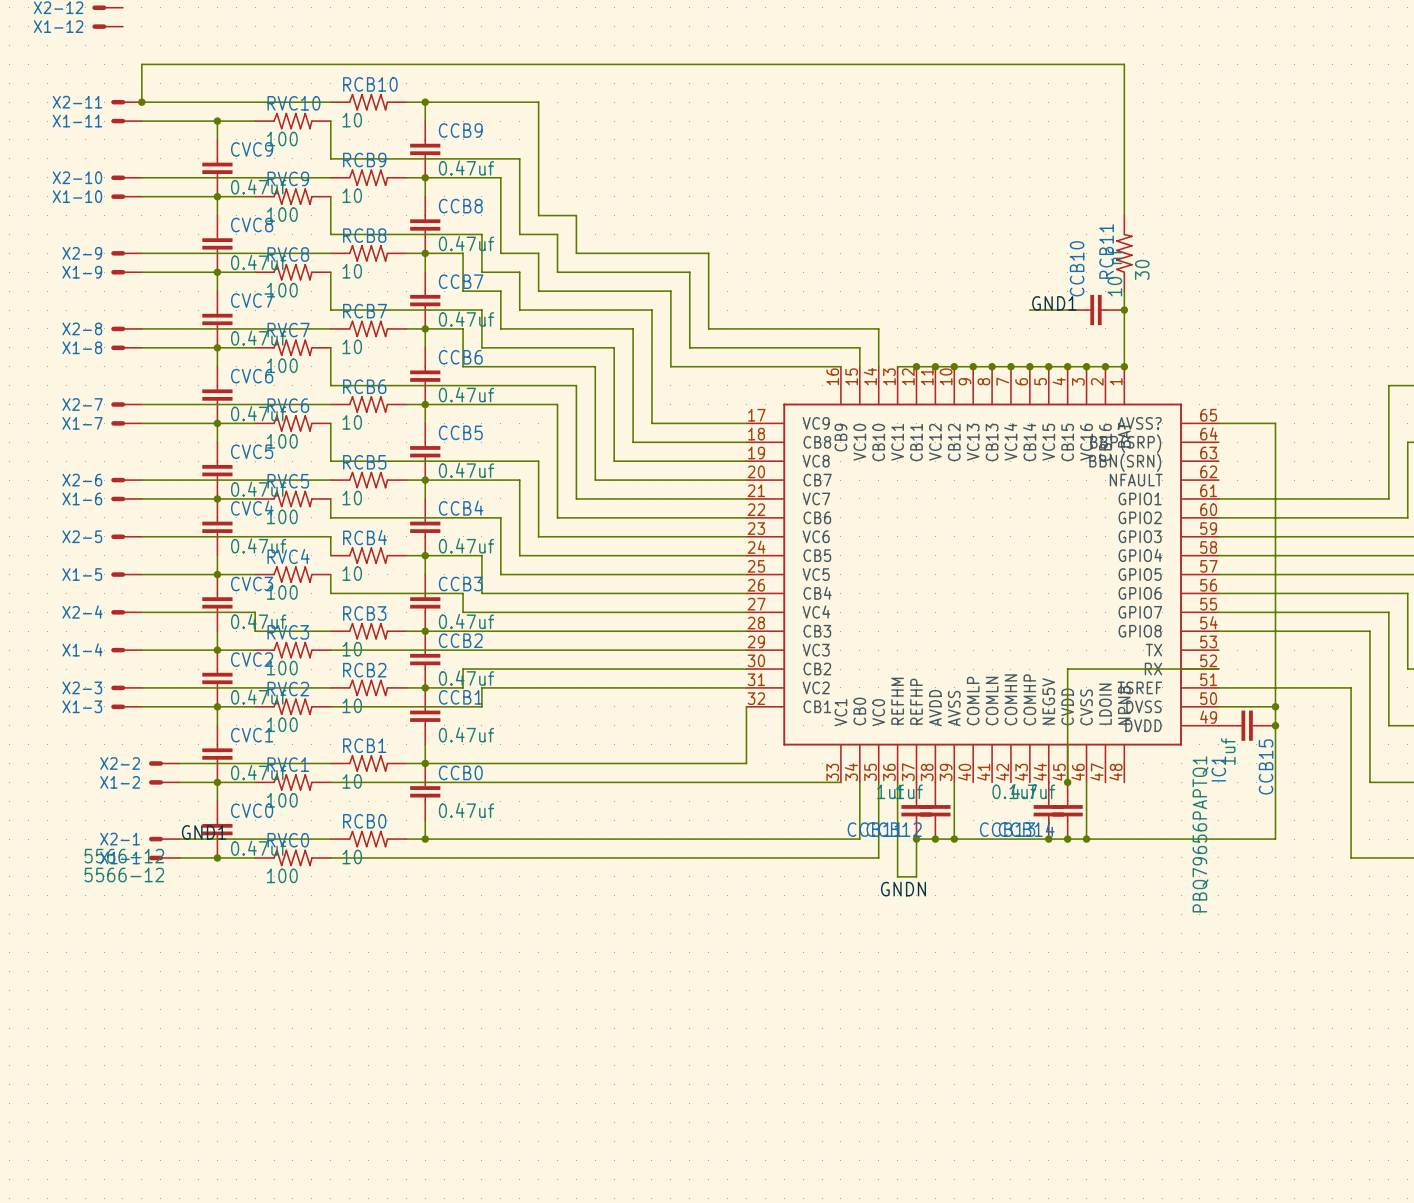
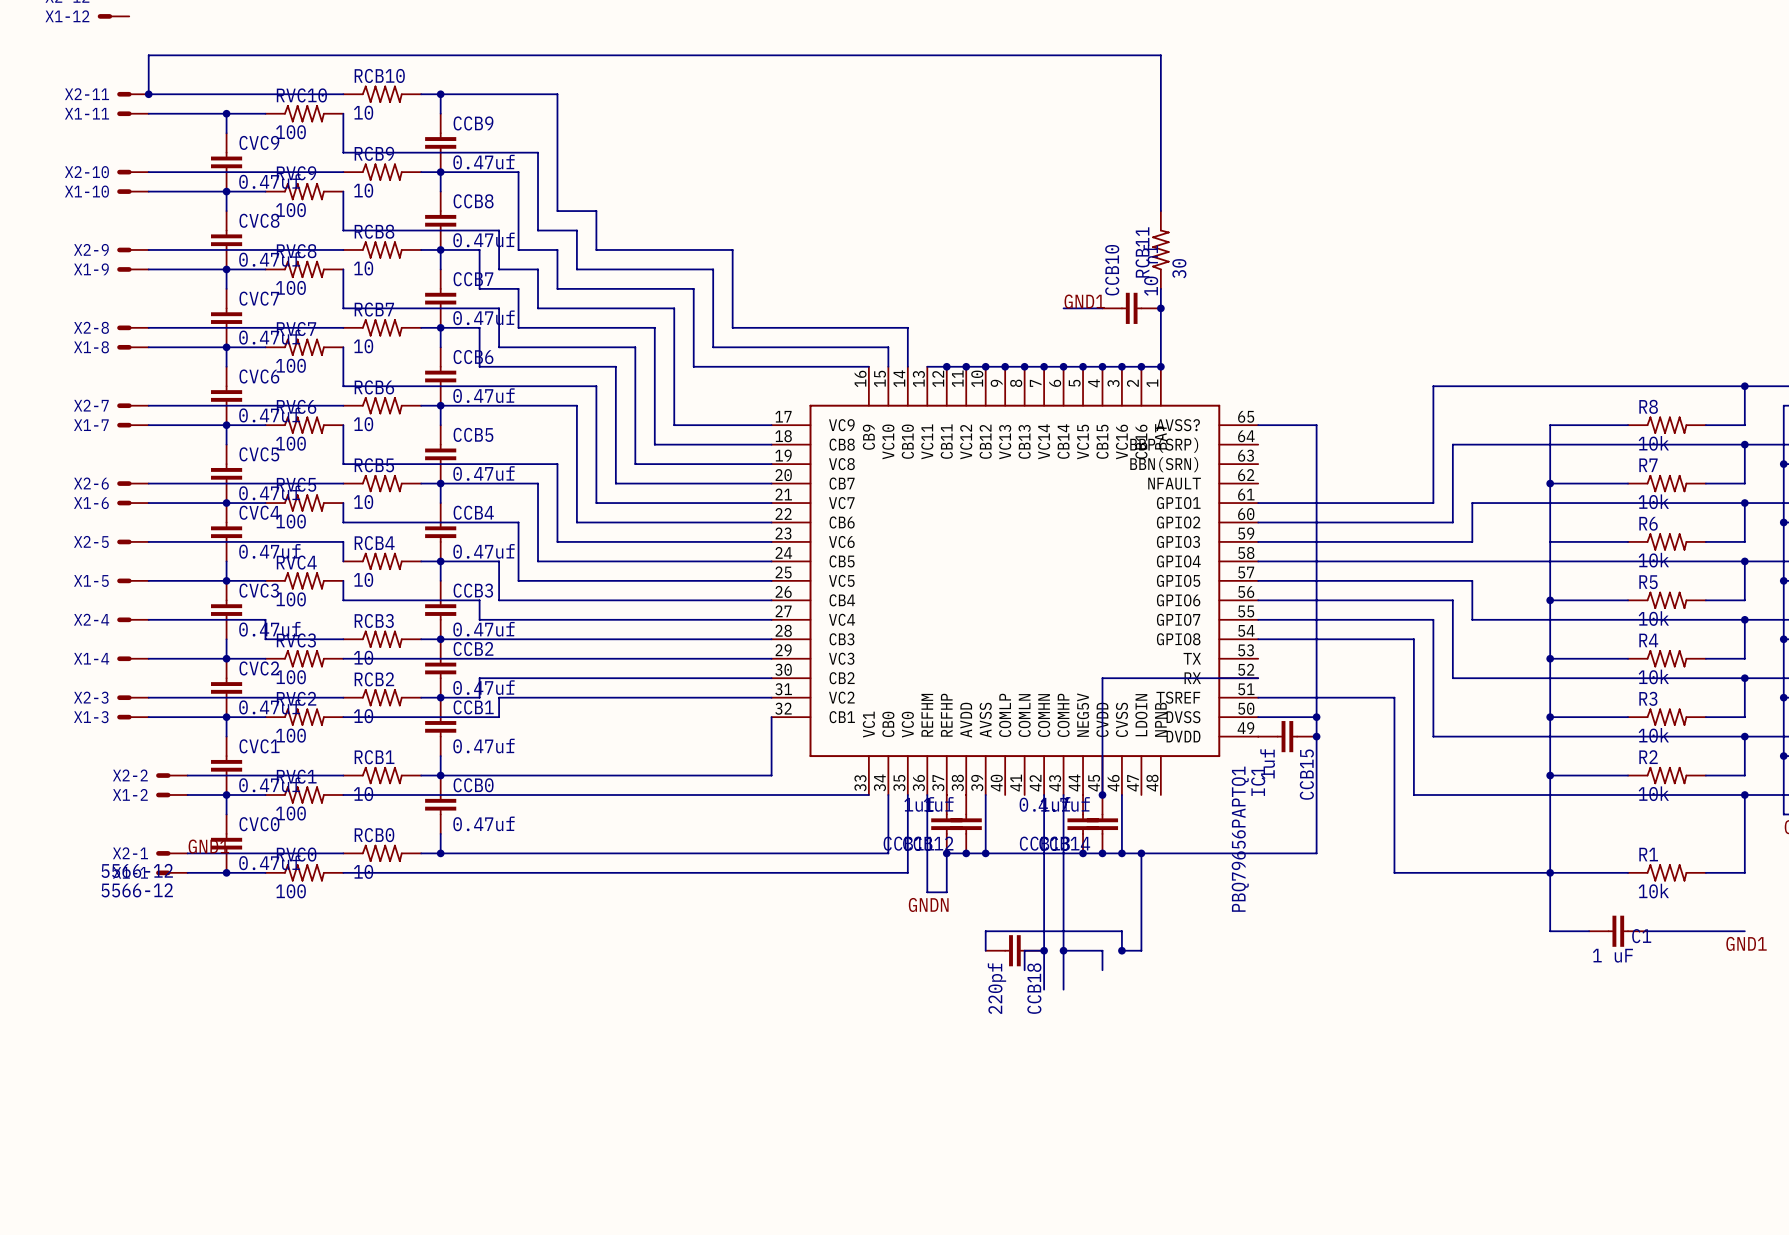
wire: none -> (1044, 795) (1044, 989)
wire: none -> (1063, 795) (1063, 989)
wire: none -> (1141, 853) (1141, 950) (1121, 950) (1121, 931) (985, 931) (985, 950)
junction: none -> (1141, 853)
CCB18: none -> 220pf (1014, 950)
wire: none -> (1044, 950) (1024, 950) (1024, 970)
junction: none -> (1044, 950)
wire: none -> (1063, 950) (1102, 950) (1102, 970)
junction: none -> (1063, 950)
junction: none -> (1121, 950)

